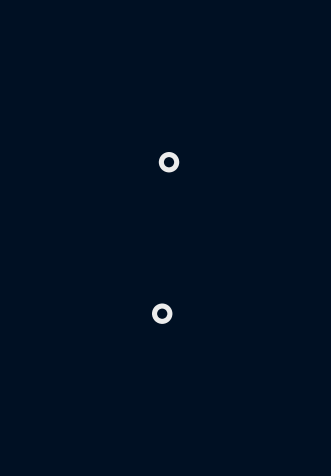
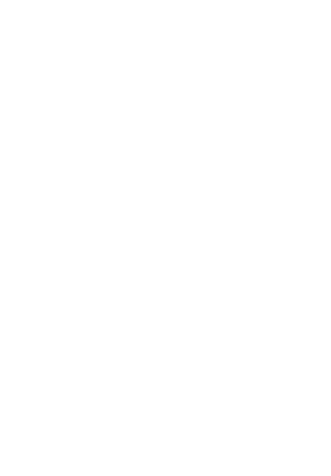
via: (169, 162) -> none
via: (162, 313) -> none

